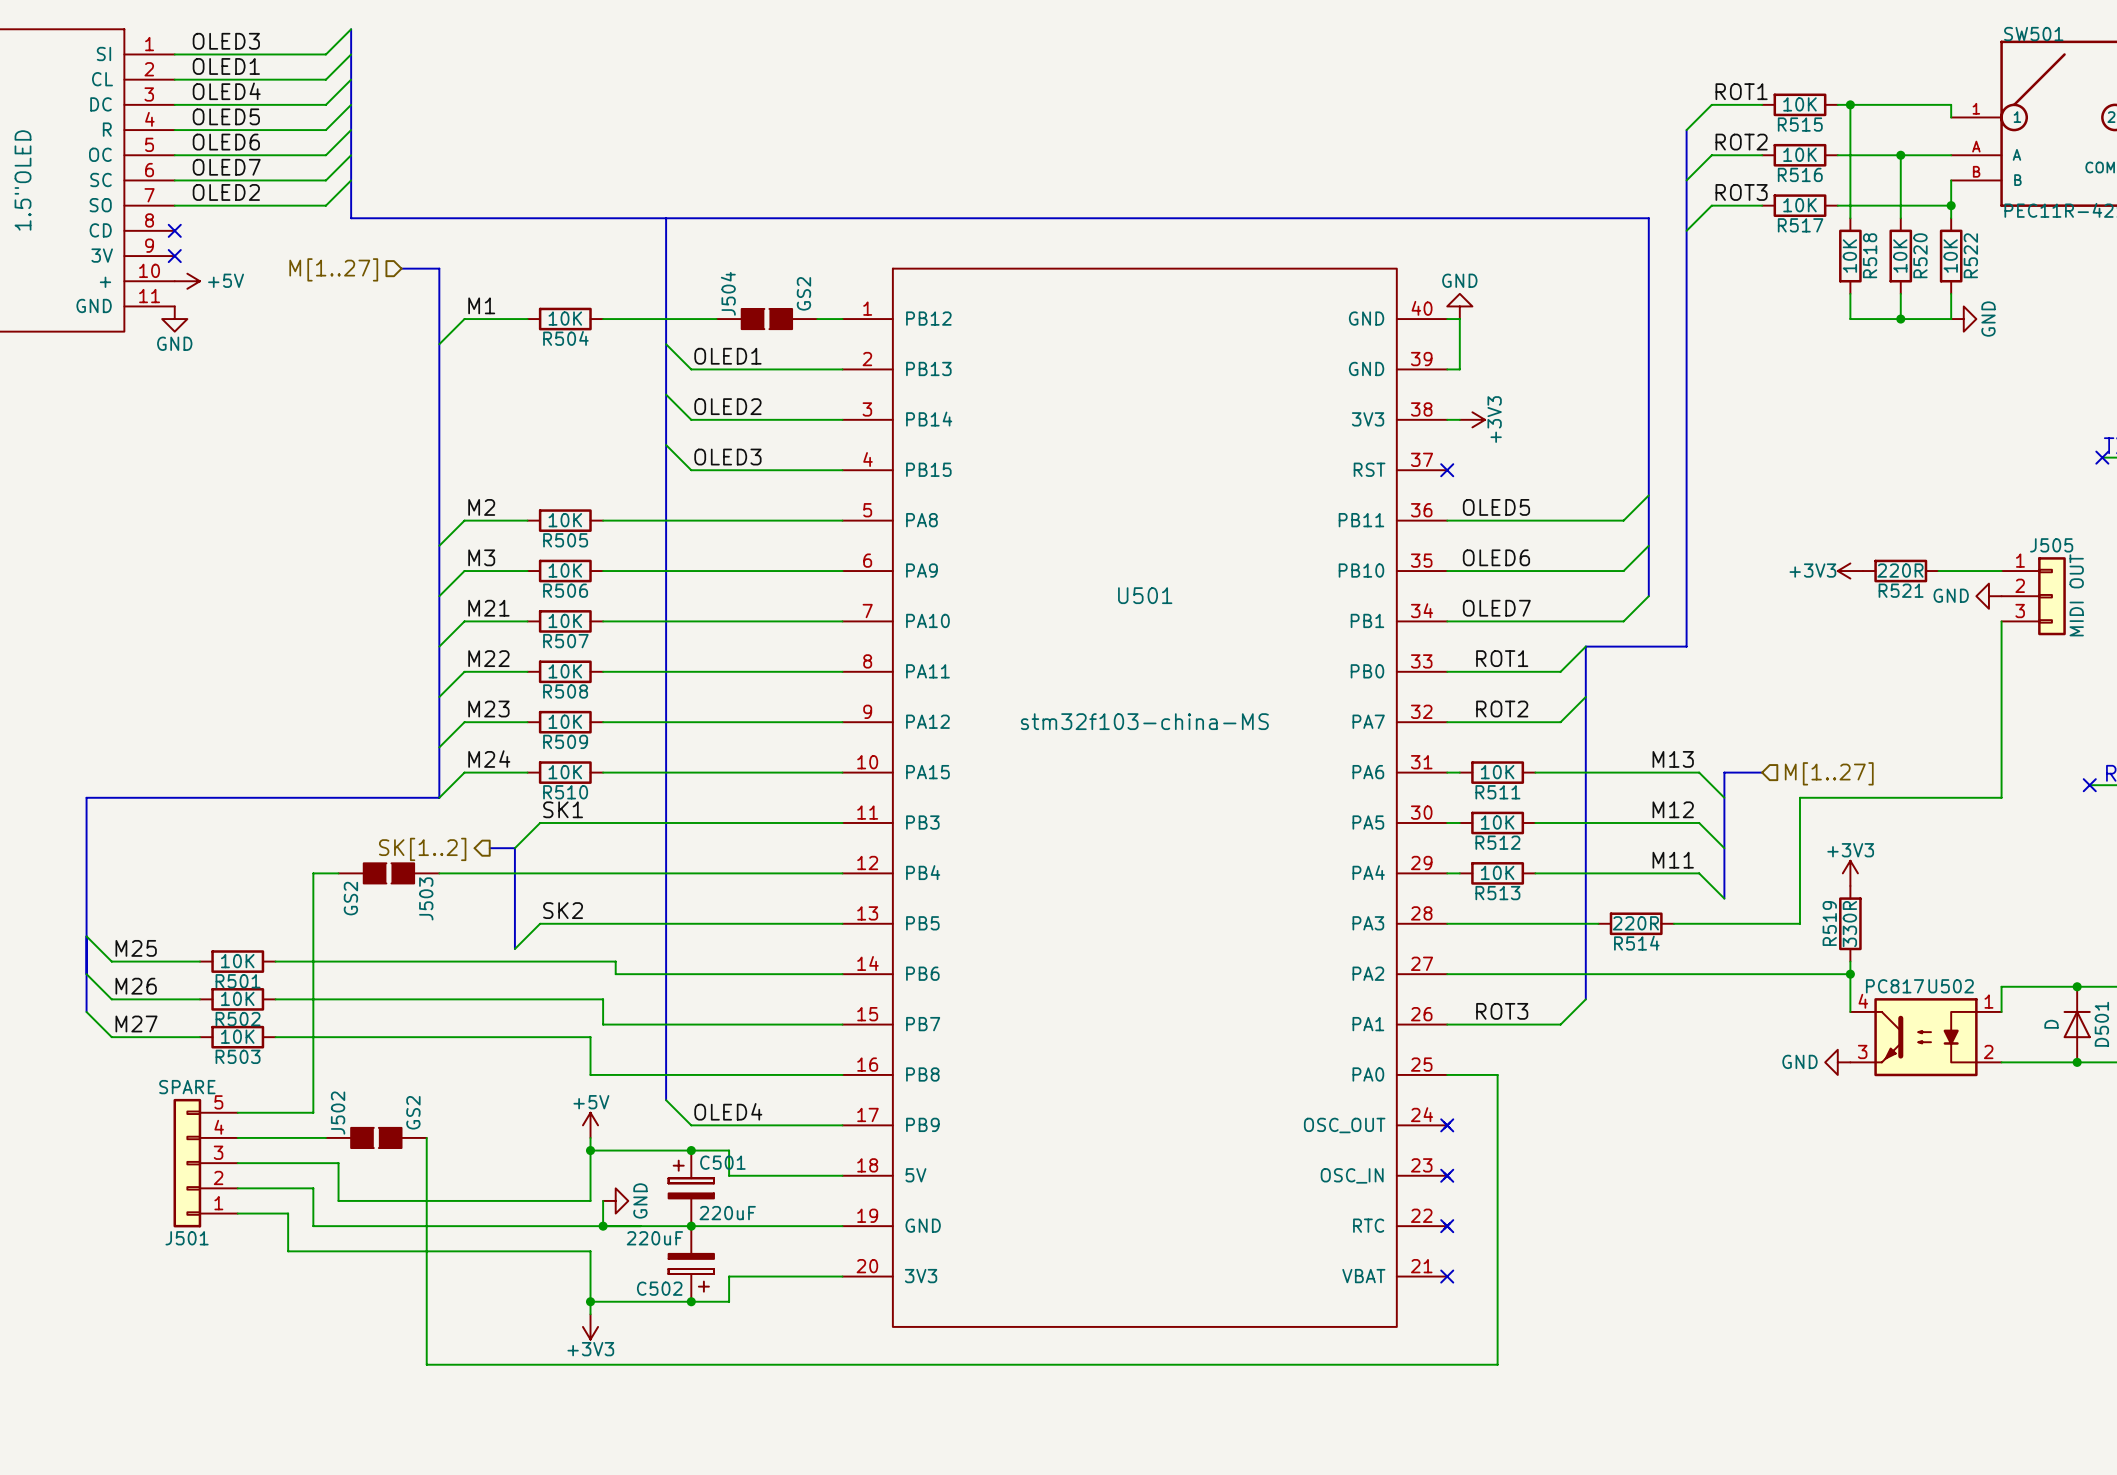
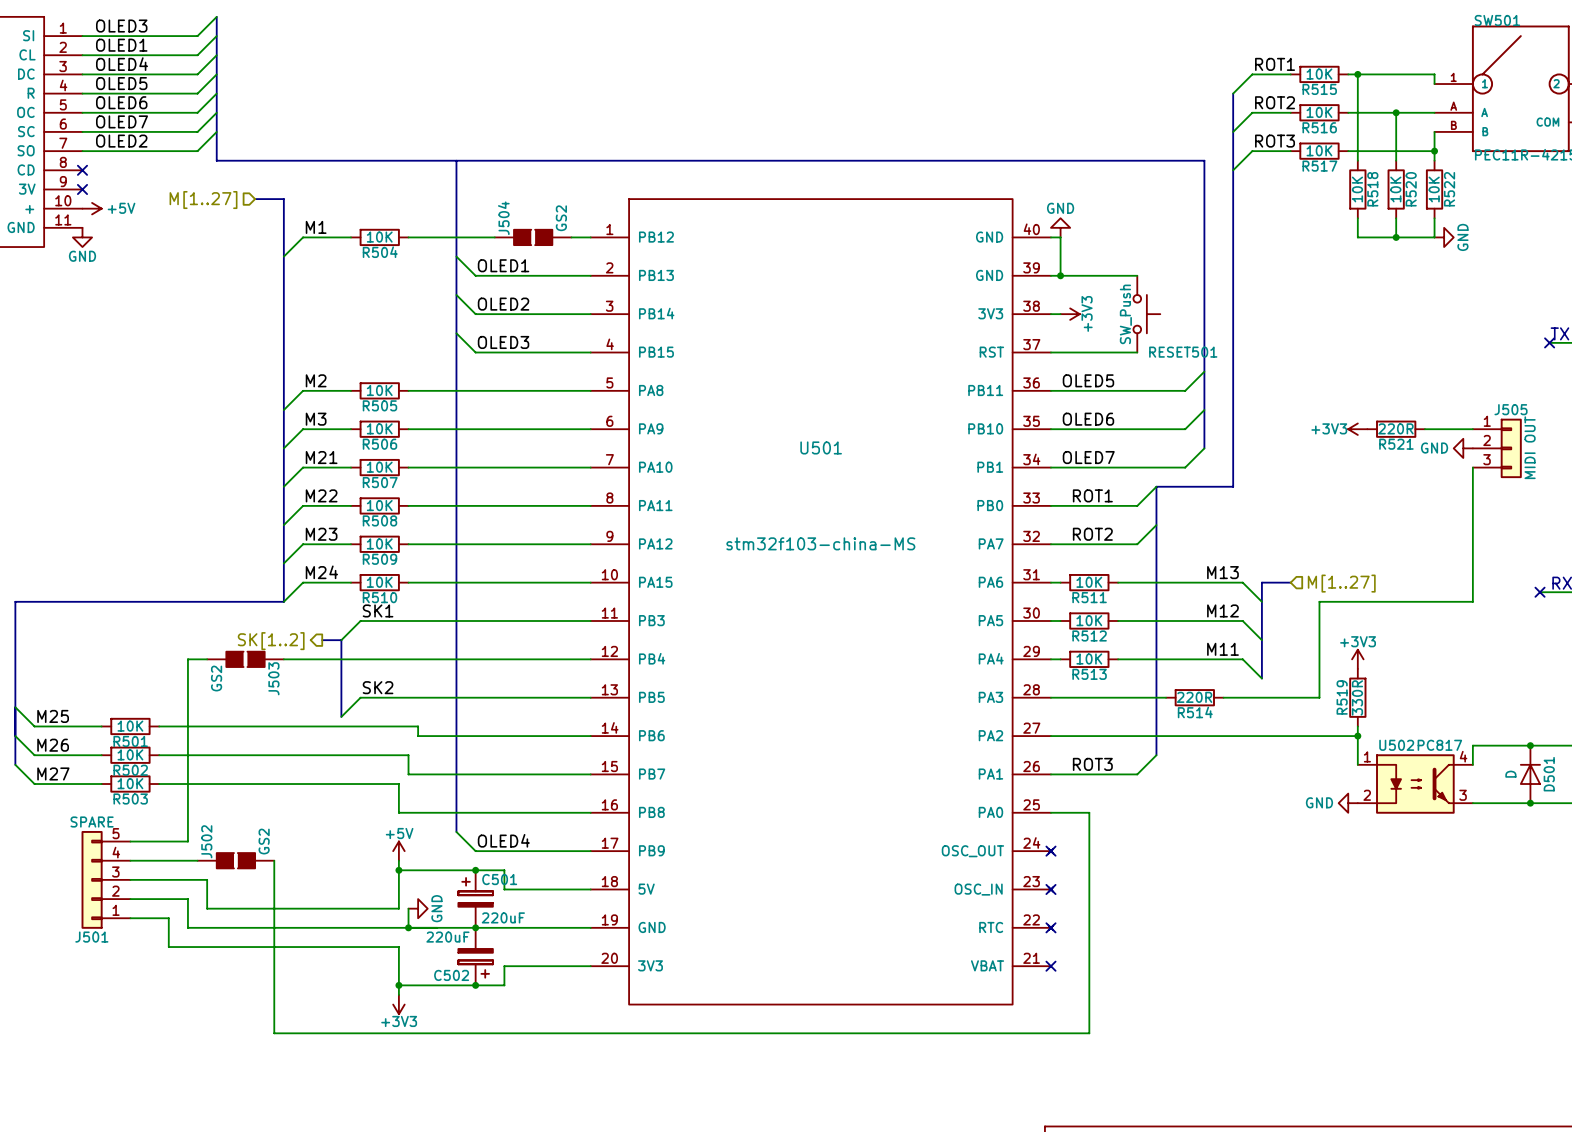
wire: none -> (1060, 275) (1137, 275)
junction: none -> (1060, 275)
RESET501: none -> SW_Push (1146, 314)
wire: none -> (1050, 352) (1137, 352)
no-connect mark: (1447, 470) -> none
U502 flip: as is (1925, 1037) -> left-right (1415, 784)

